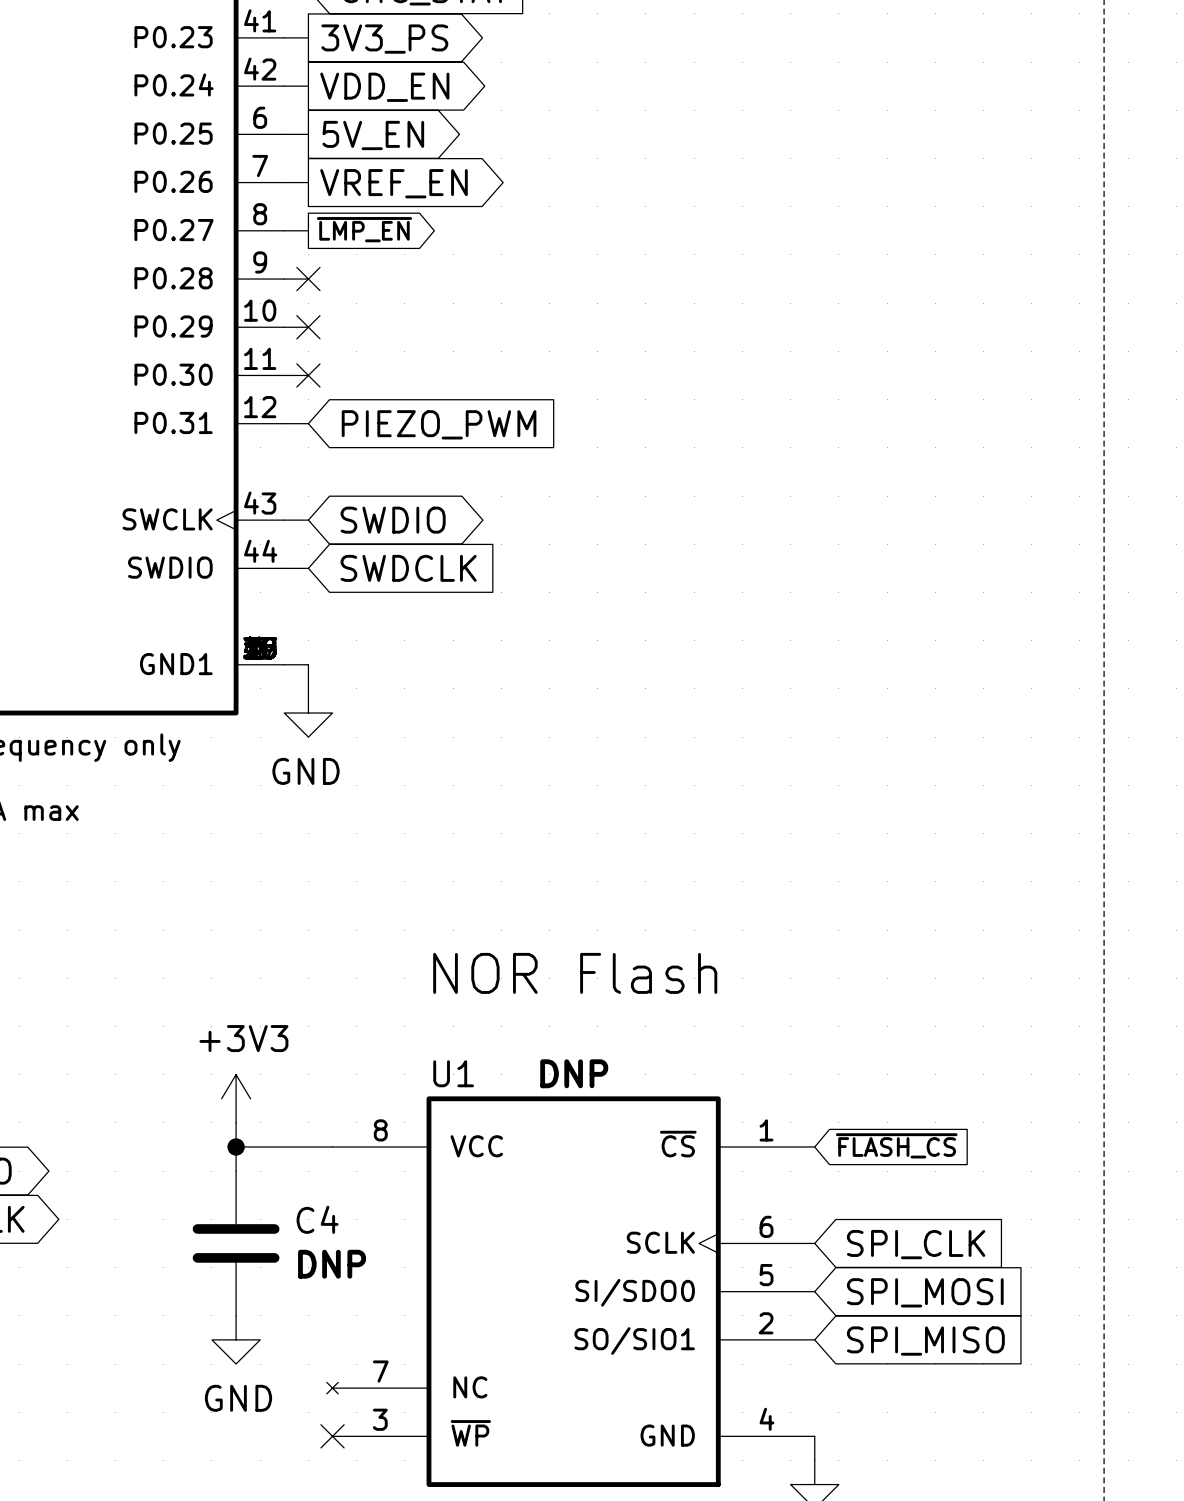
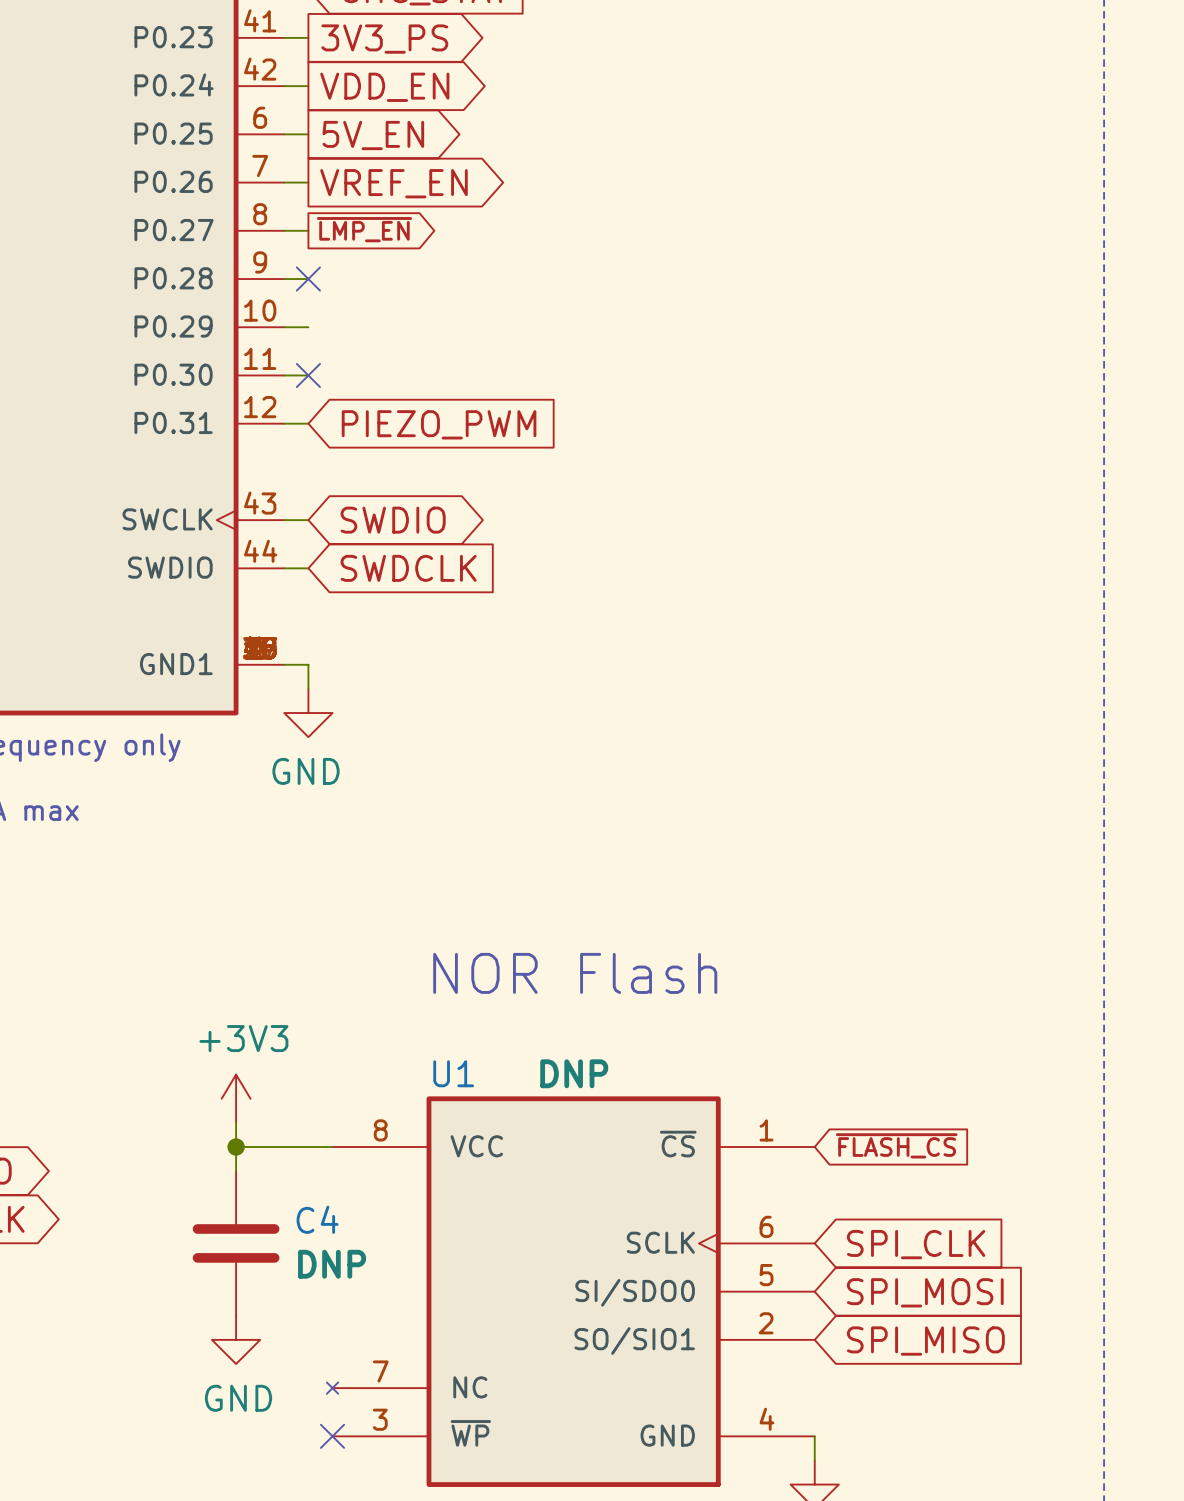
no-connect mark: (308, 327) -> none

